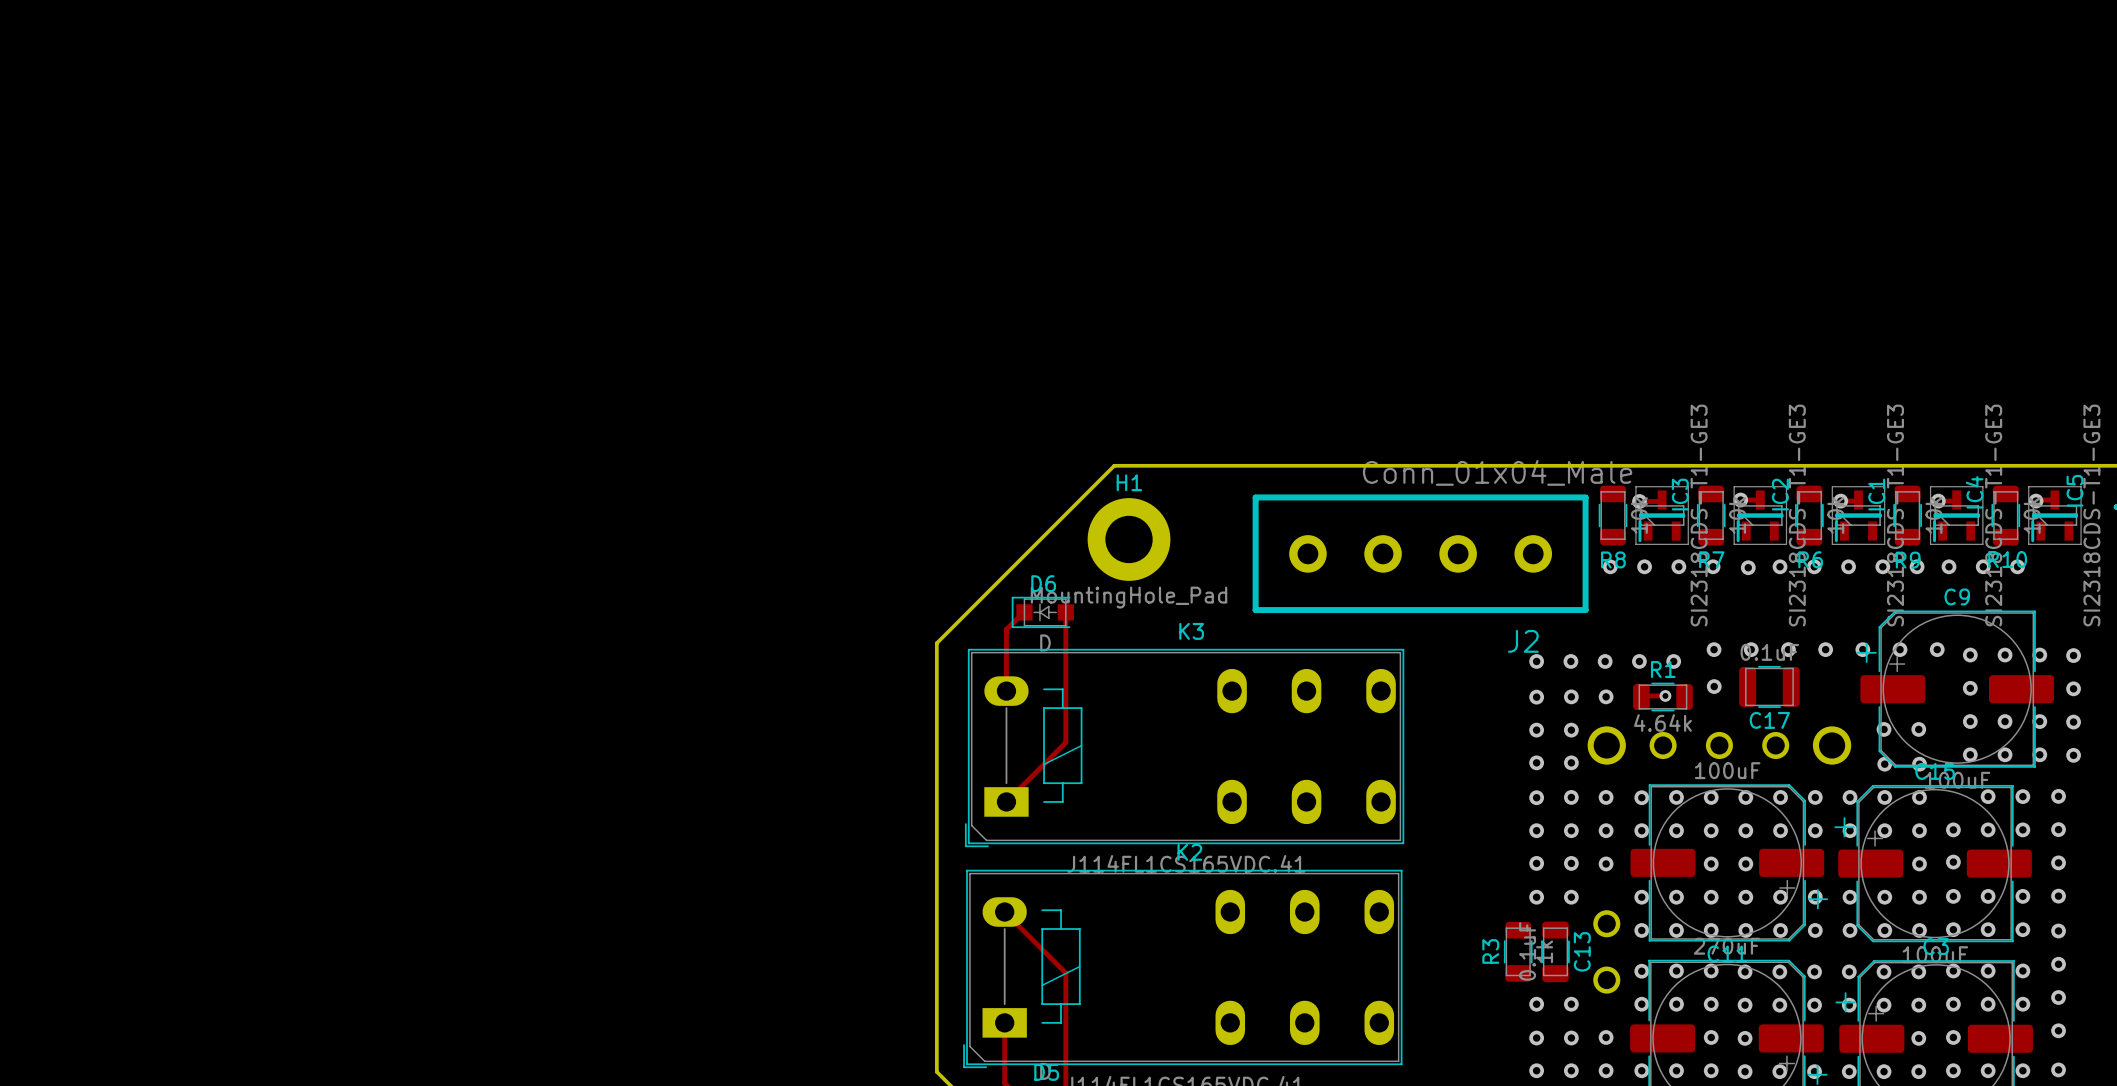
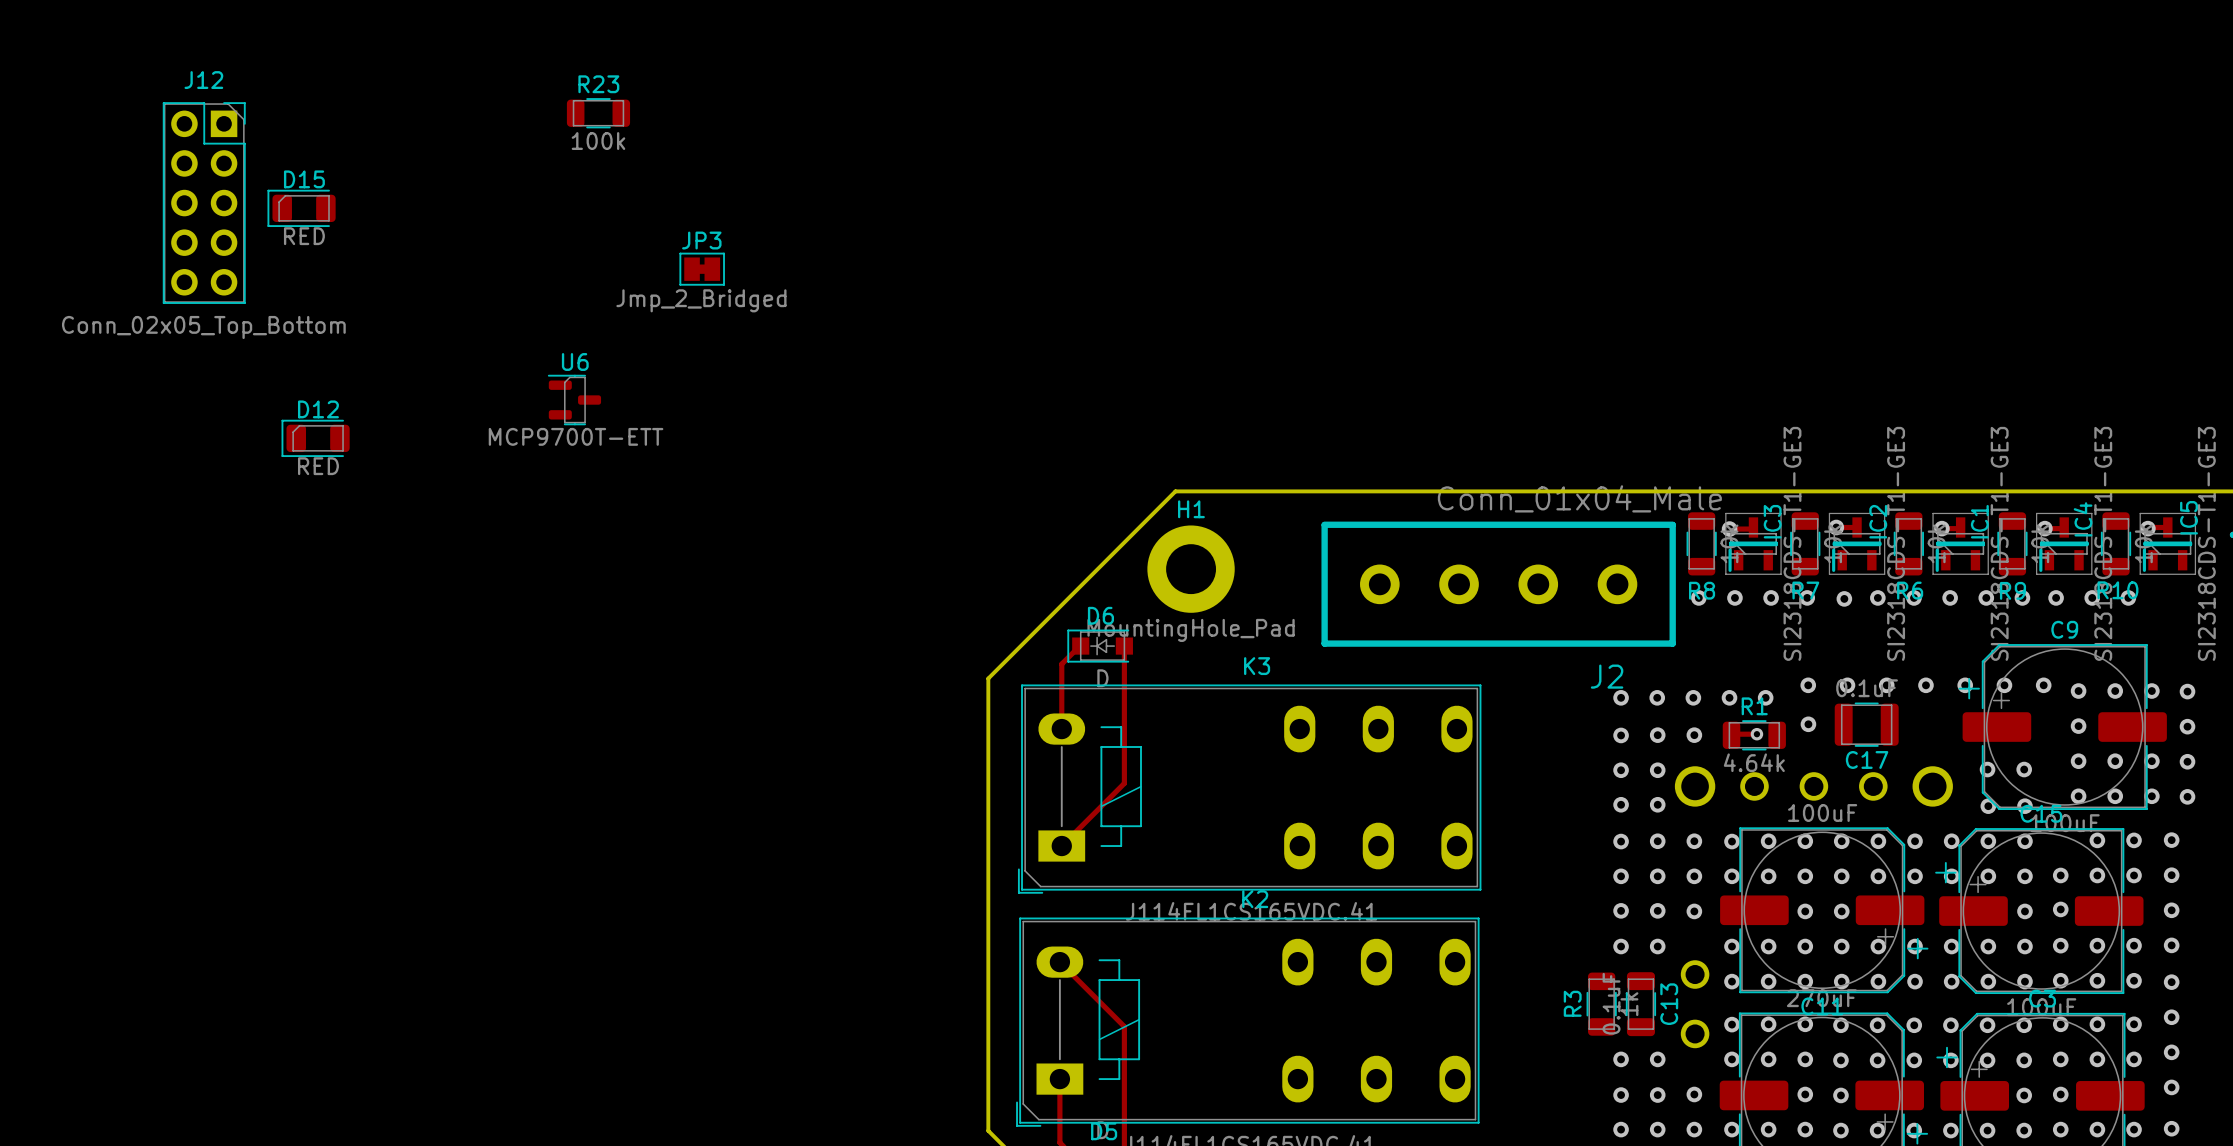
R23: none -> 100k (598, 113)
J12: none -> Conn_02x05_Top_Bottom (204, 203)
D15: none -> RED (301, 208)
JP3: none -> Jmp_2_Bridged (702, 269)
U6: none -> MCP9700T-ETT (574, 400)
D12: none -> RED (315, 438)

